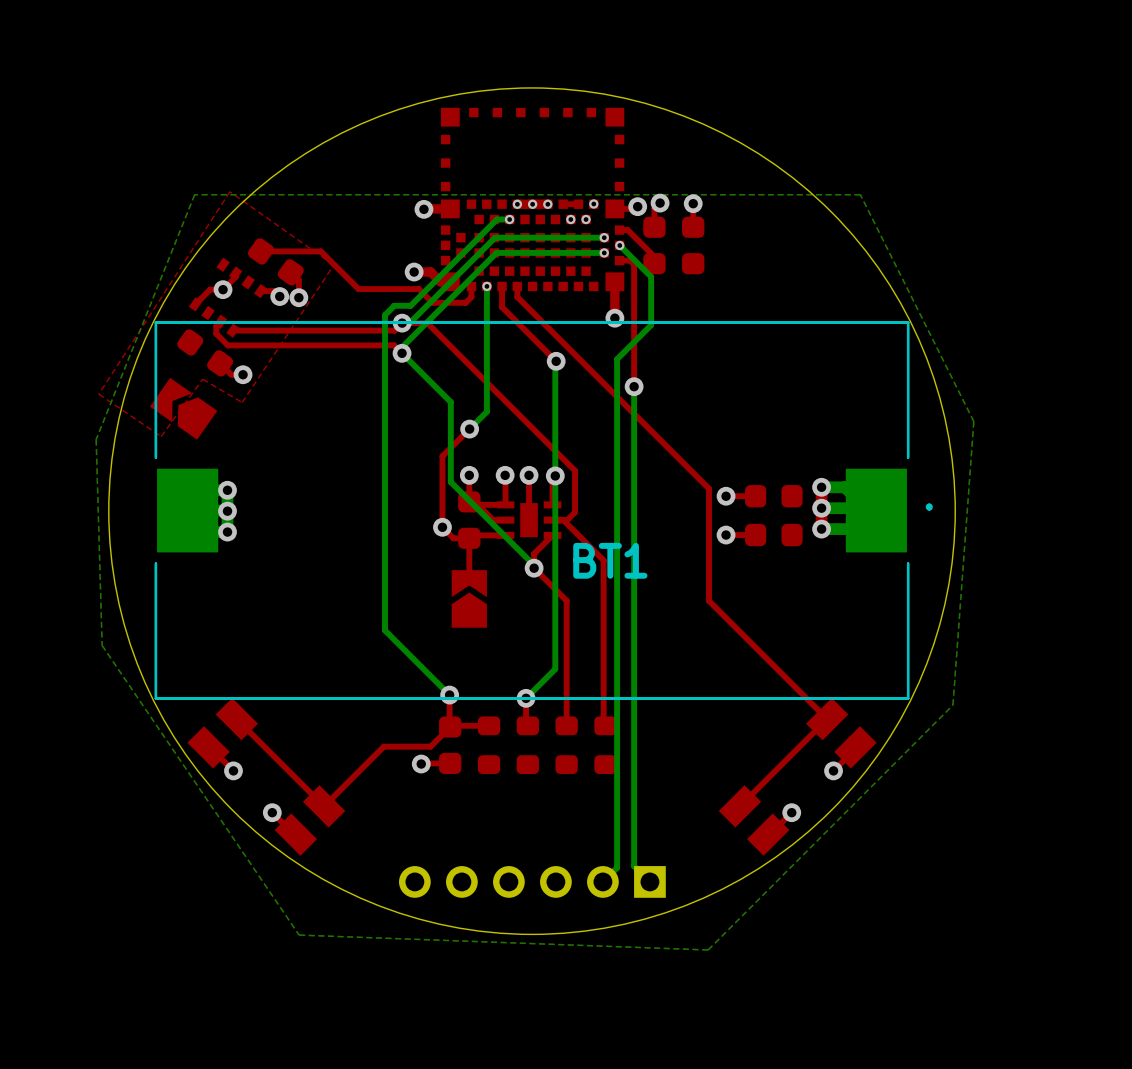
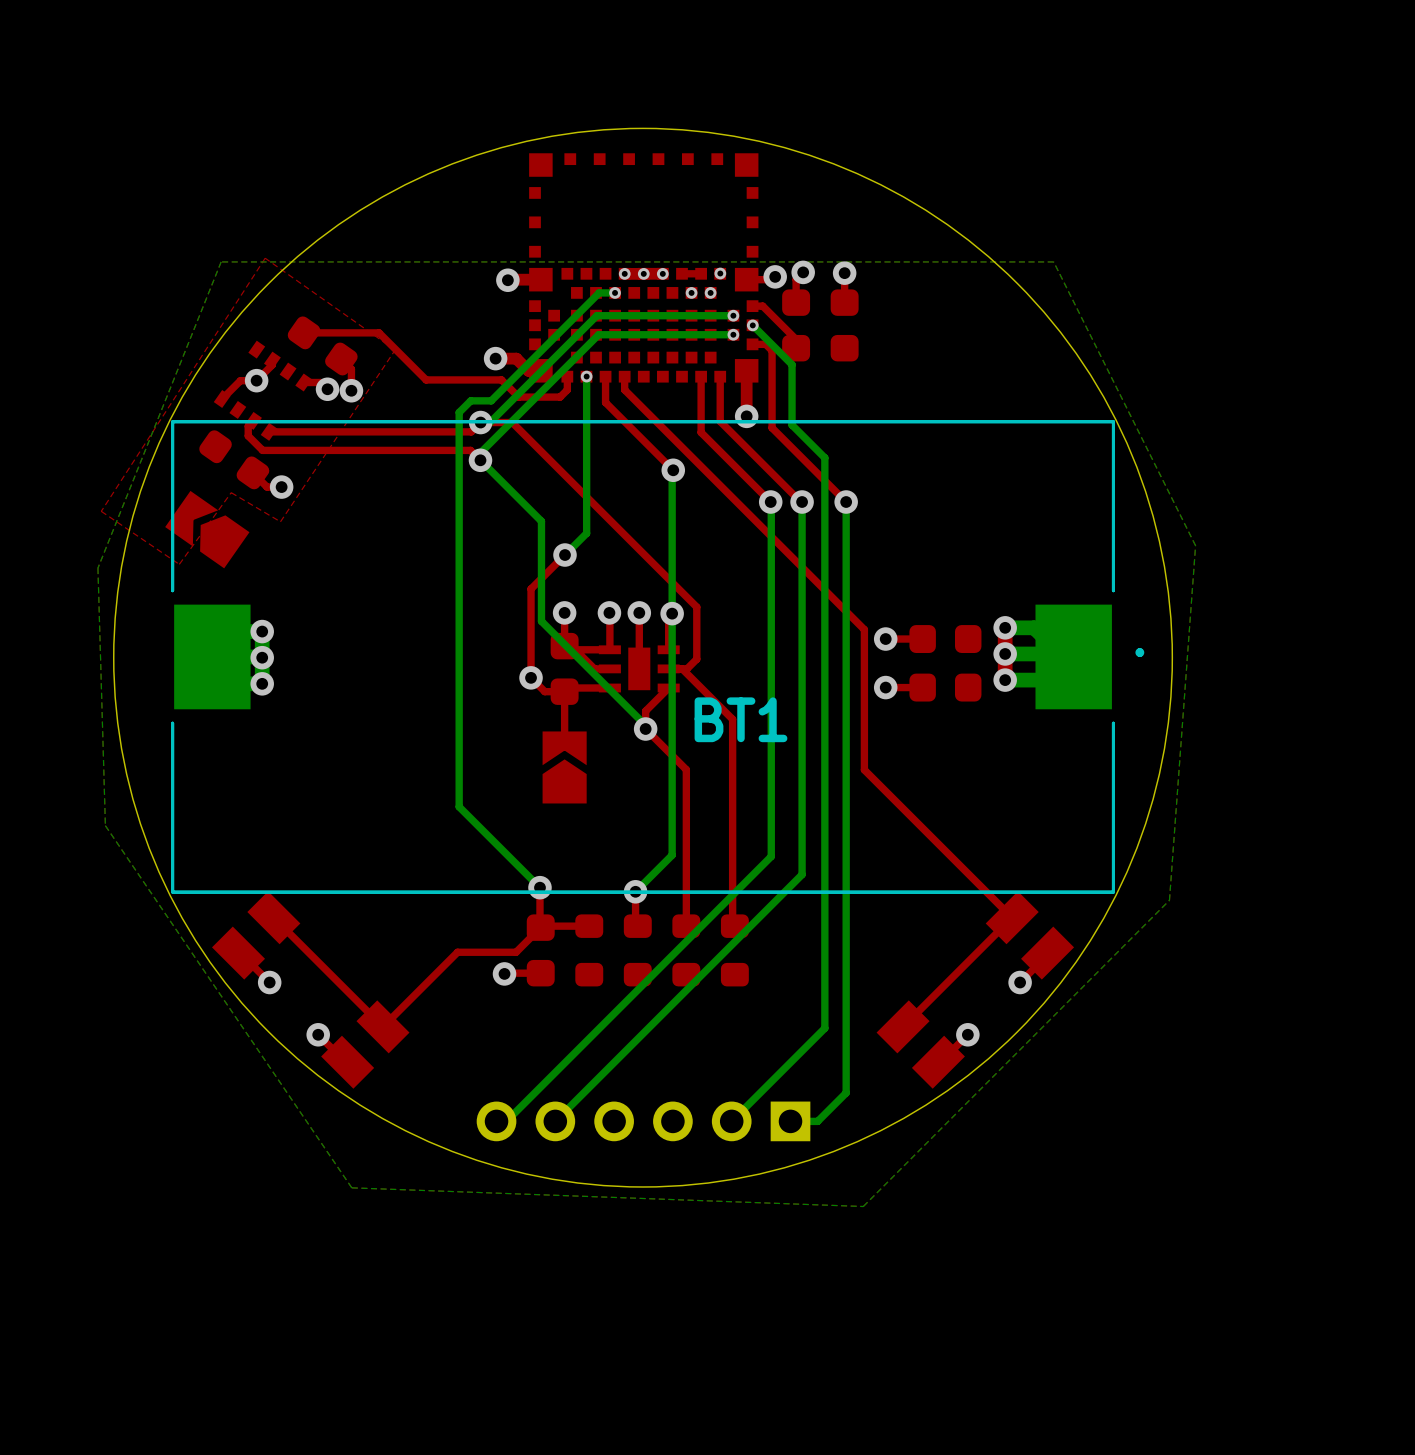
top track: (634, 264) (634, 386) -> (770, 349) (772, 427) (846, 502)
top track: none -> (701, 376) (701, 432) (771, 502)
top track: none -> (720, 376) (720, 421) (802, 502)
bottom track: (651, 325) (617, 359) (617, 867) -> (792, 425) (824, 457) (824, 1028) (749, 1103)
bottom track: (634, 386) (634, 866) (649, 881) -> (846, 502) (846, 1092) (817, 1121) (790, 1121)
bottom track: none -> (802, 502) (802, 874) (555, 1121)
via: none -> (802, 502)
via: none -> (846, 502)
bottom track: none -> (771, 502) (771, 856) (506, 1121) (496, 1121)

